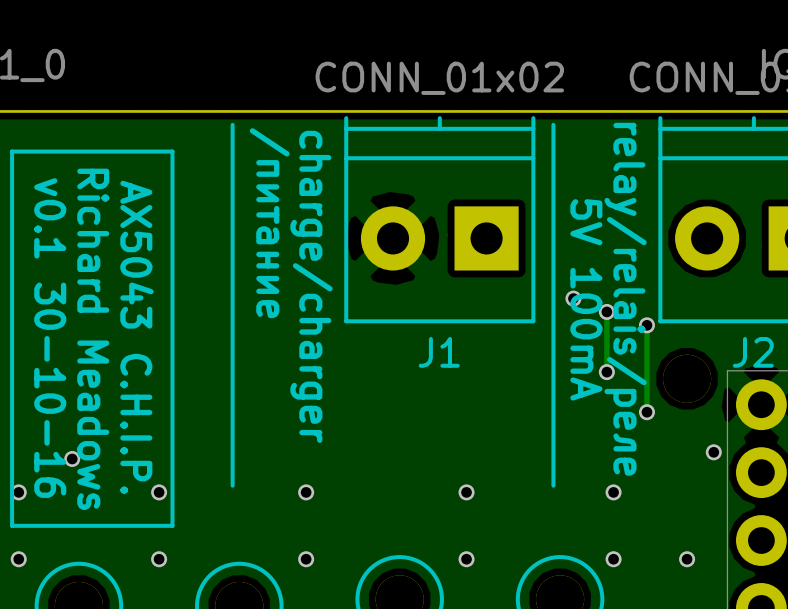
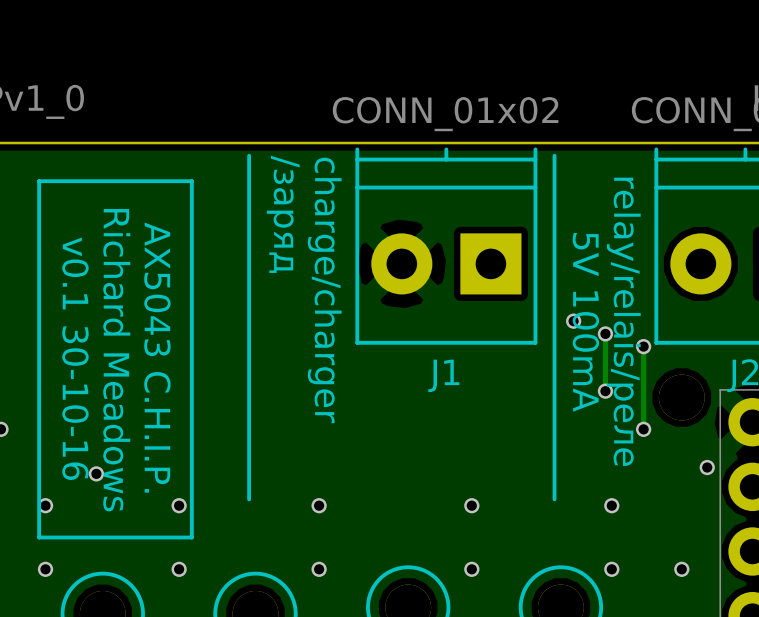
text: /питание (269, 223) -> /заряд (283, 214)

